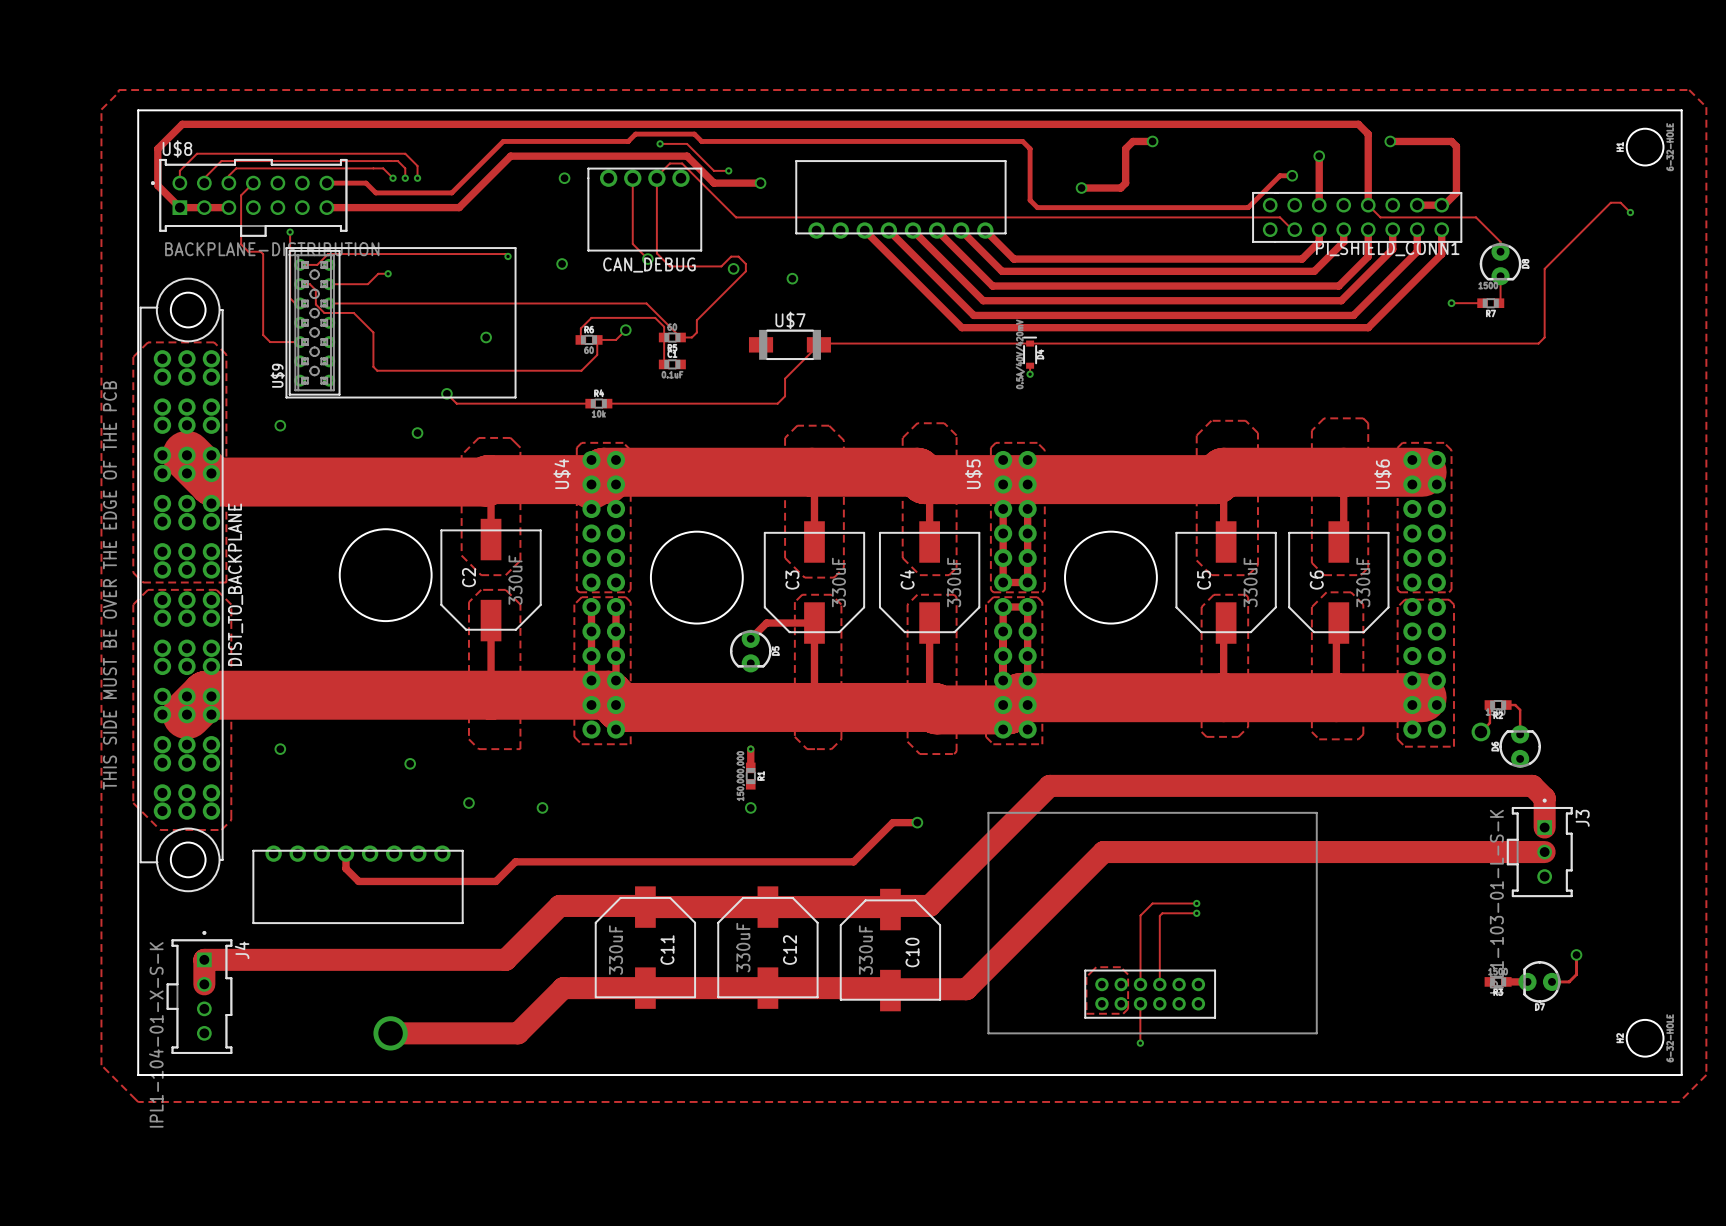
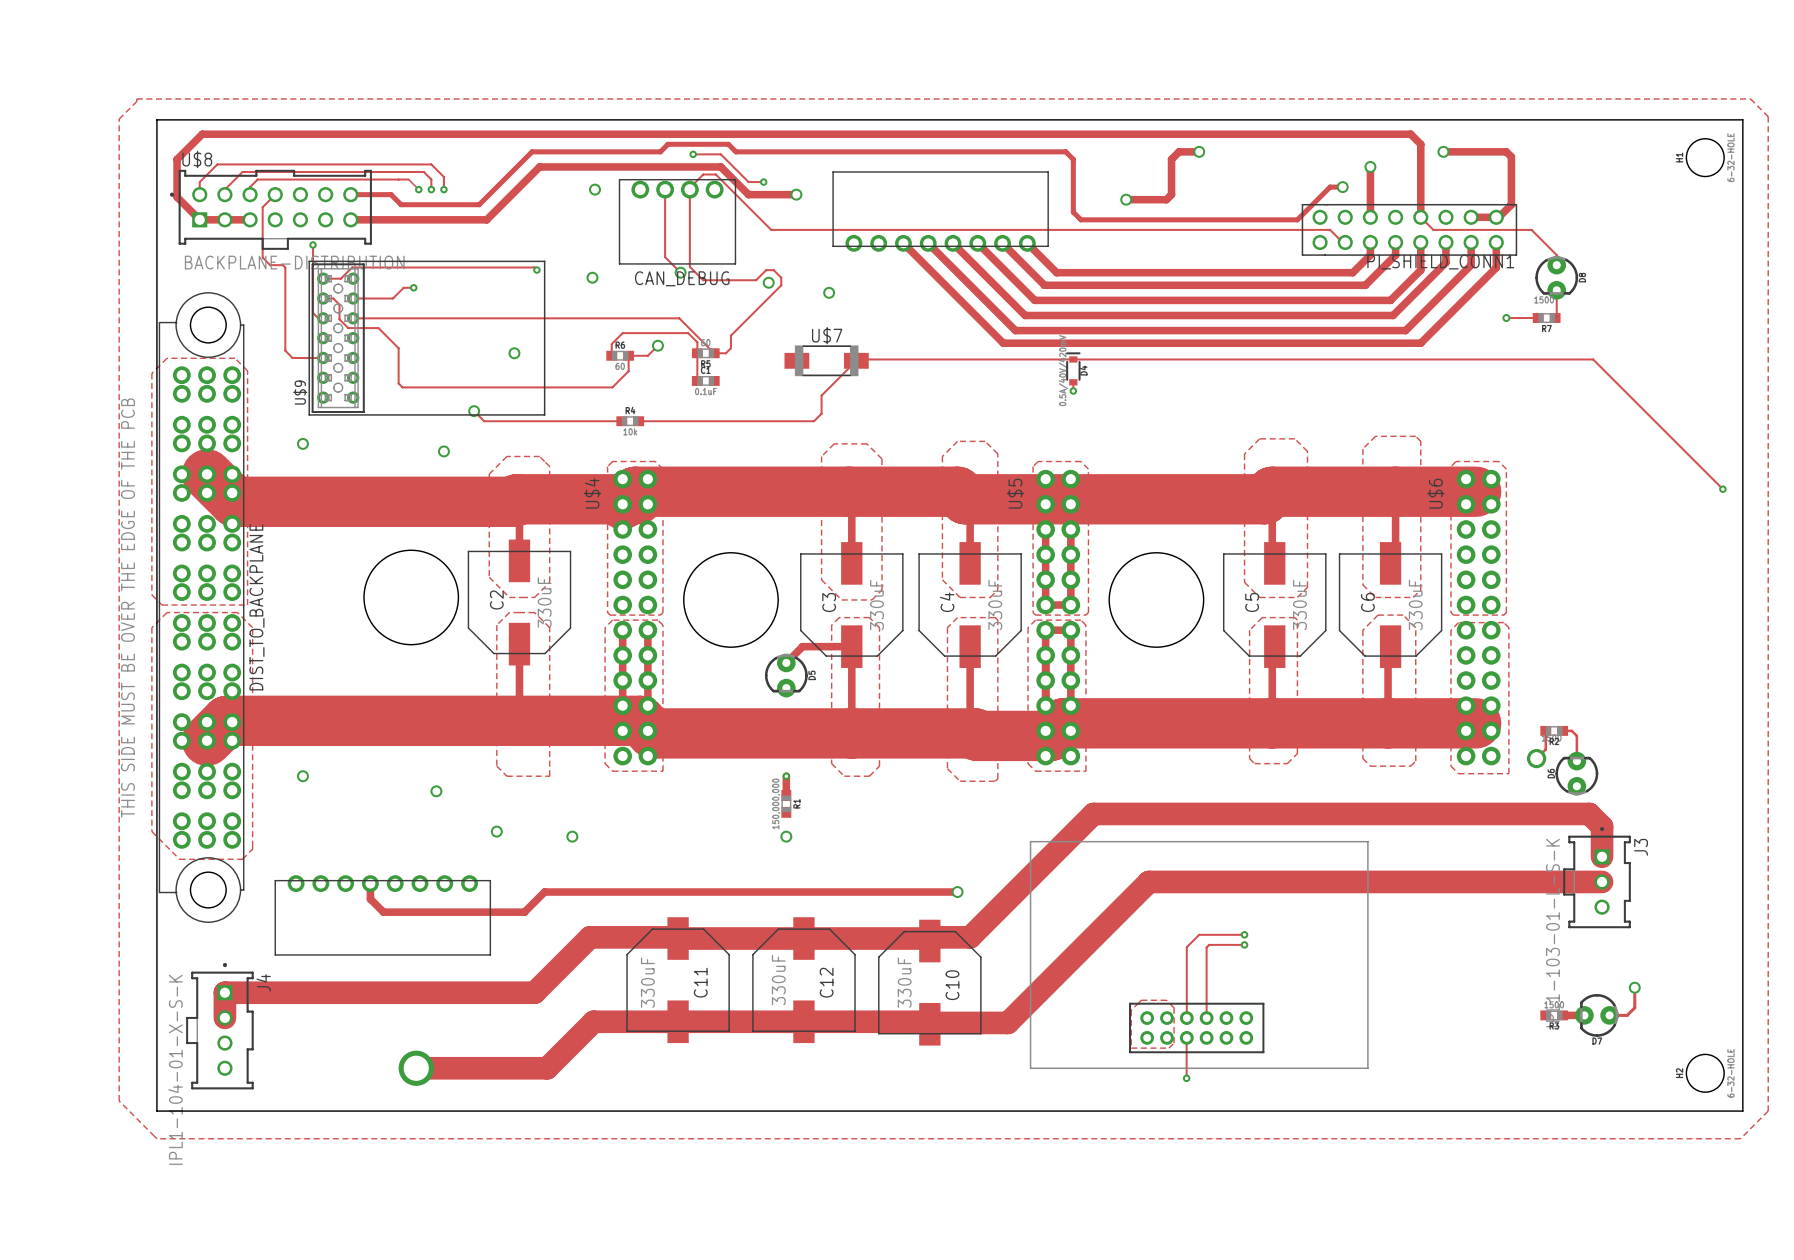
track: (1630, 212) (1620, 202) (1610, 202) (1544, 268) (1544, 337) (1536, 343) -> (1722, 489) (1593, 359)
via: (1630, 212) -> none
via: none -> (1722, 489)
track: (917, 822) (892, 822) (853, 861) -> (957, 892) (892, 892)
via position: (917, 822) -> (957, 892)

